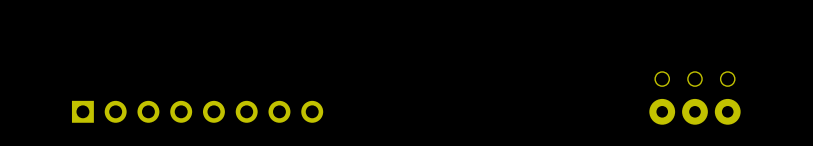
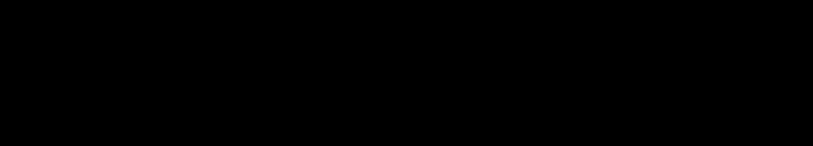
part: (694, 98) -> none
part: (197, 111) -> none

